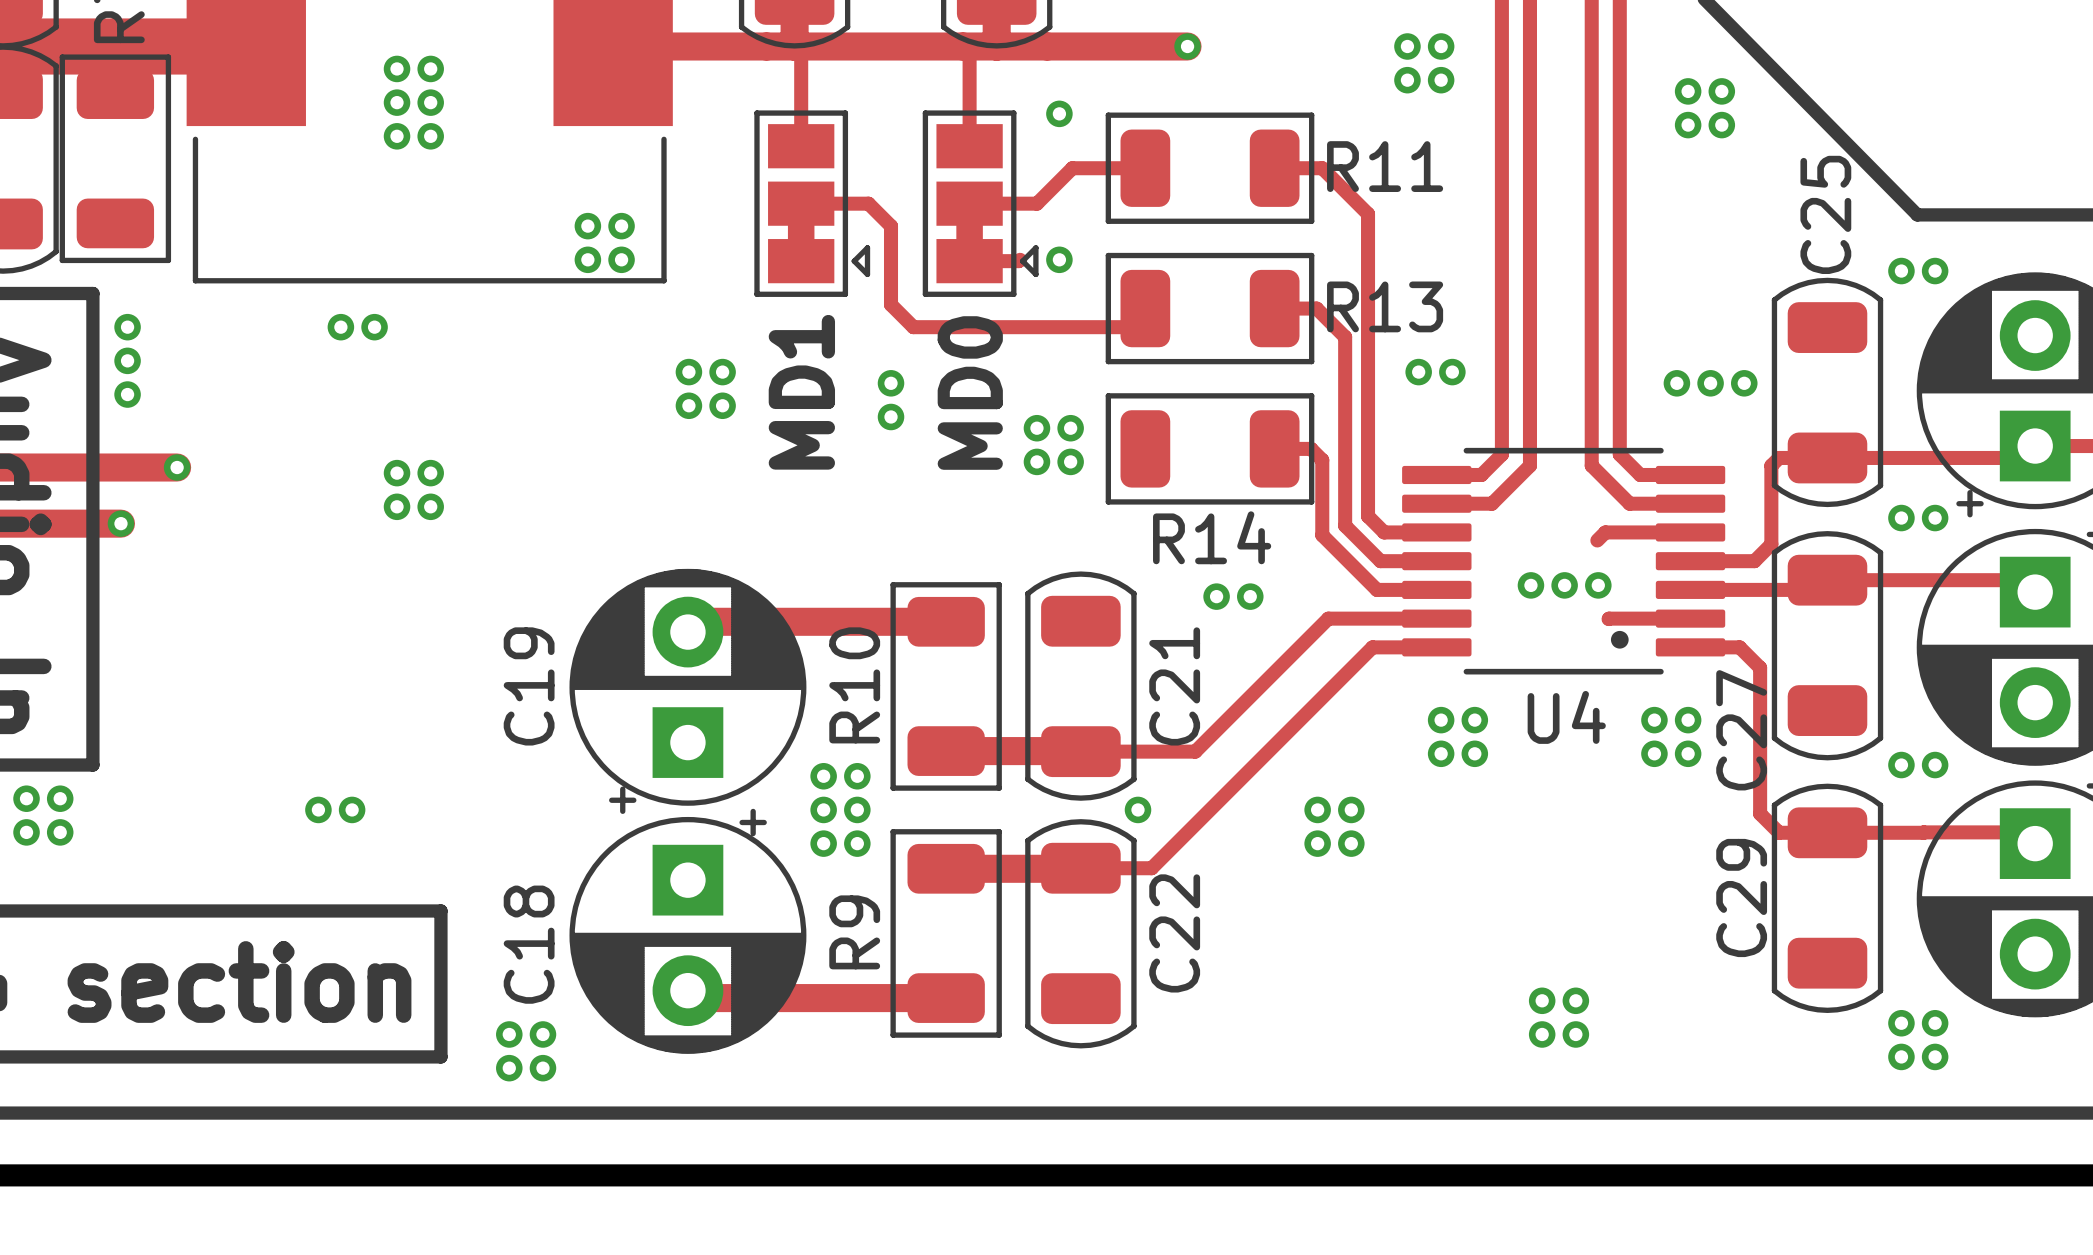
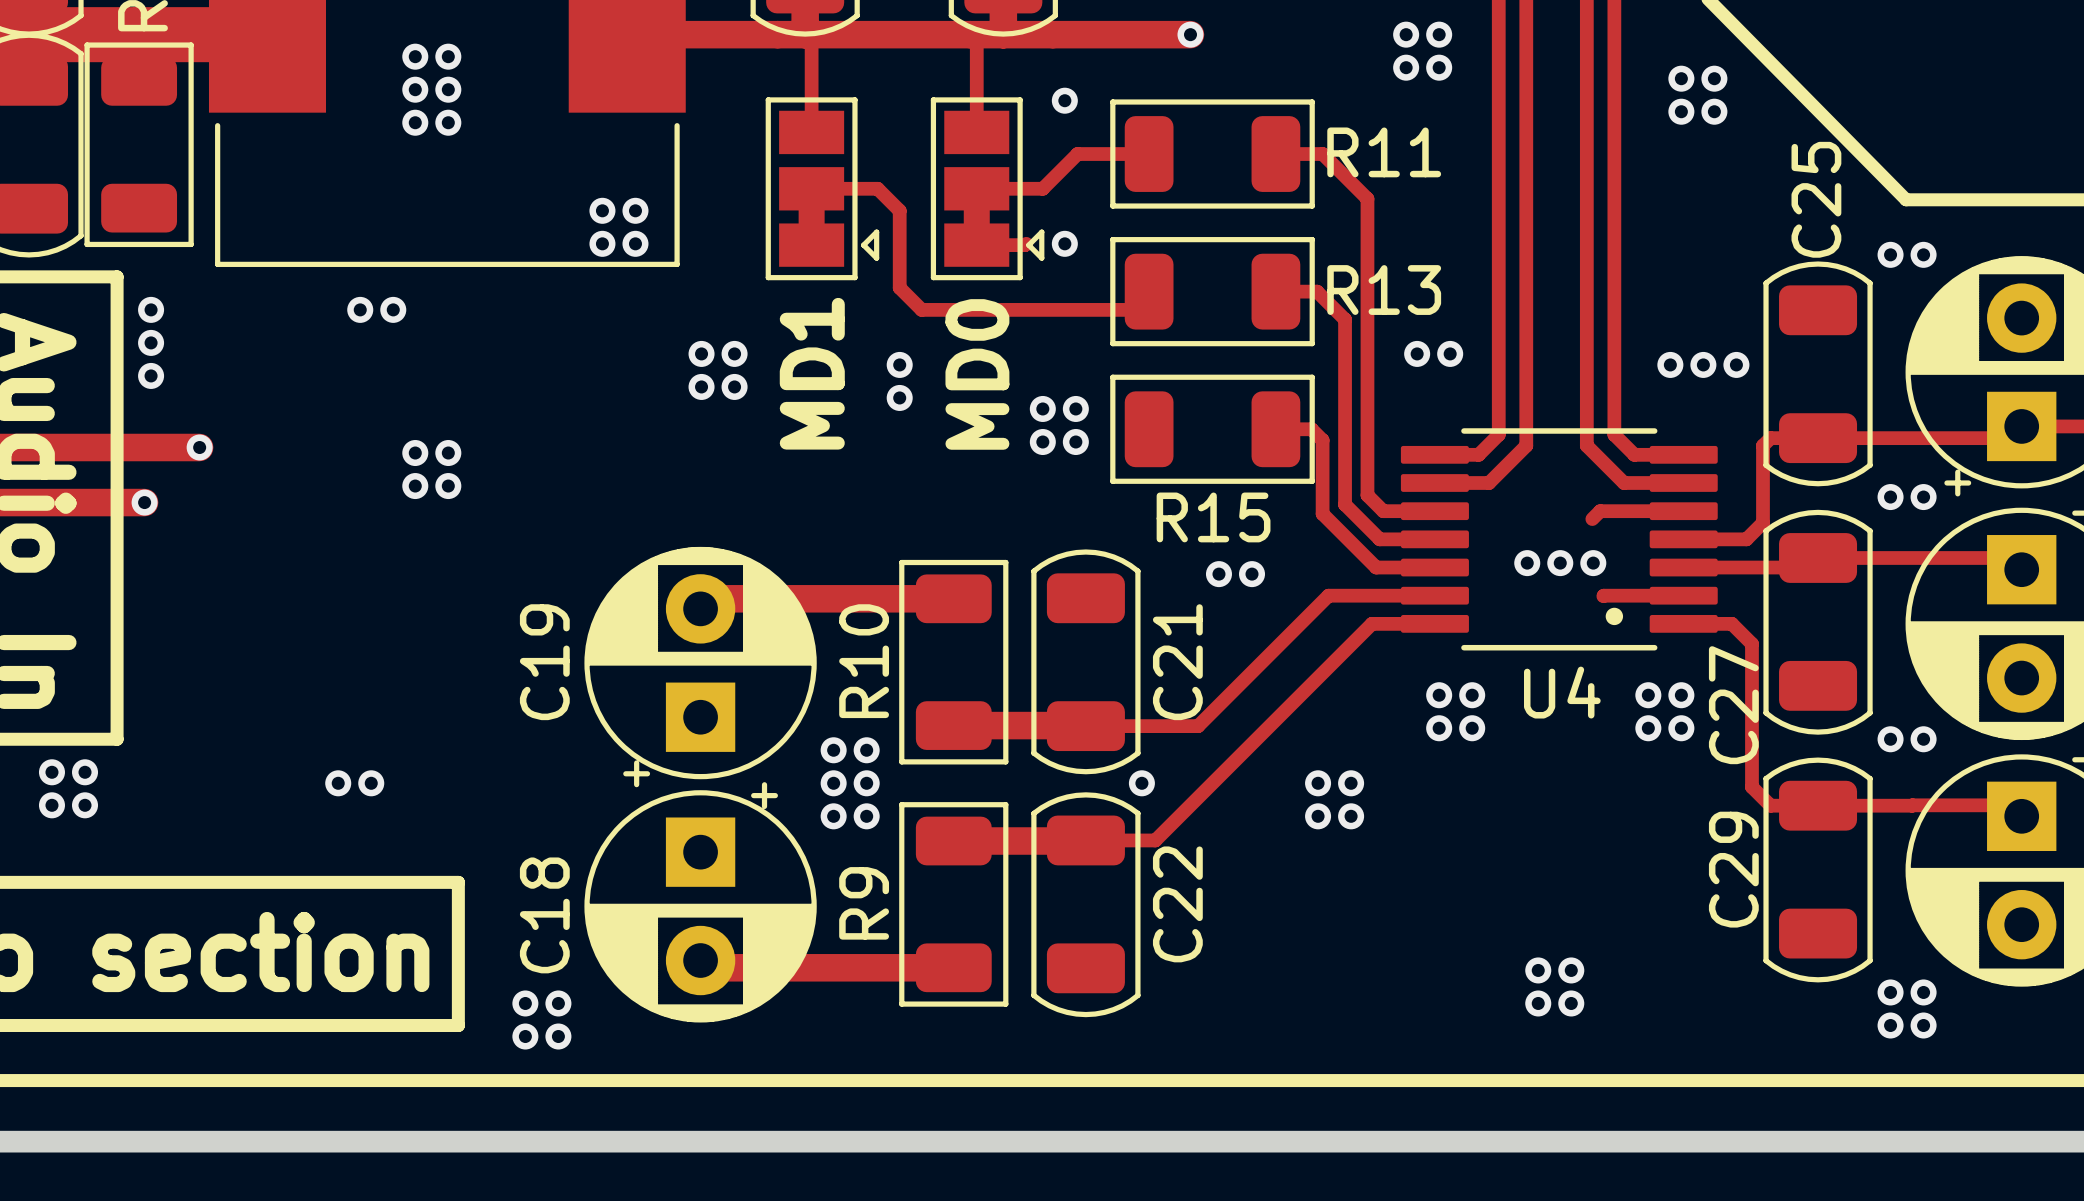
R14 name: R14 (1212, 537) -> R15 (1213, 517)

